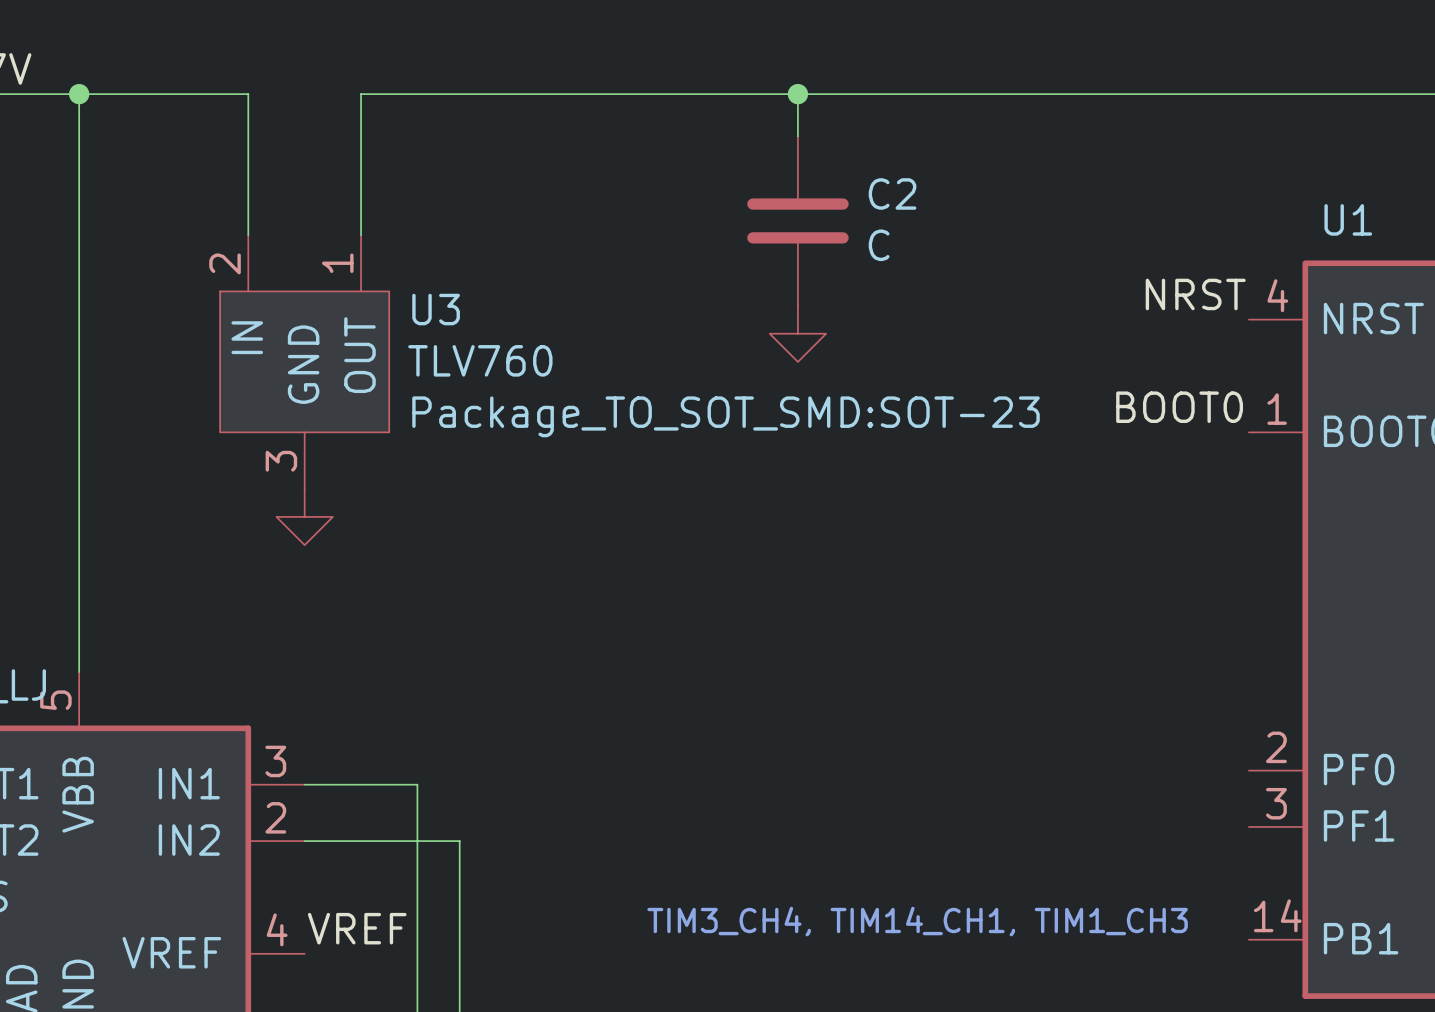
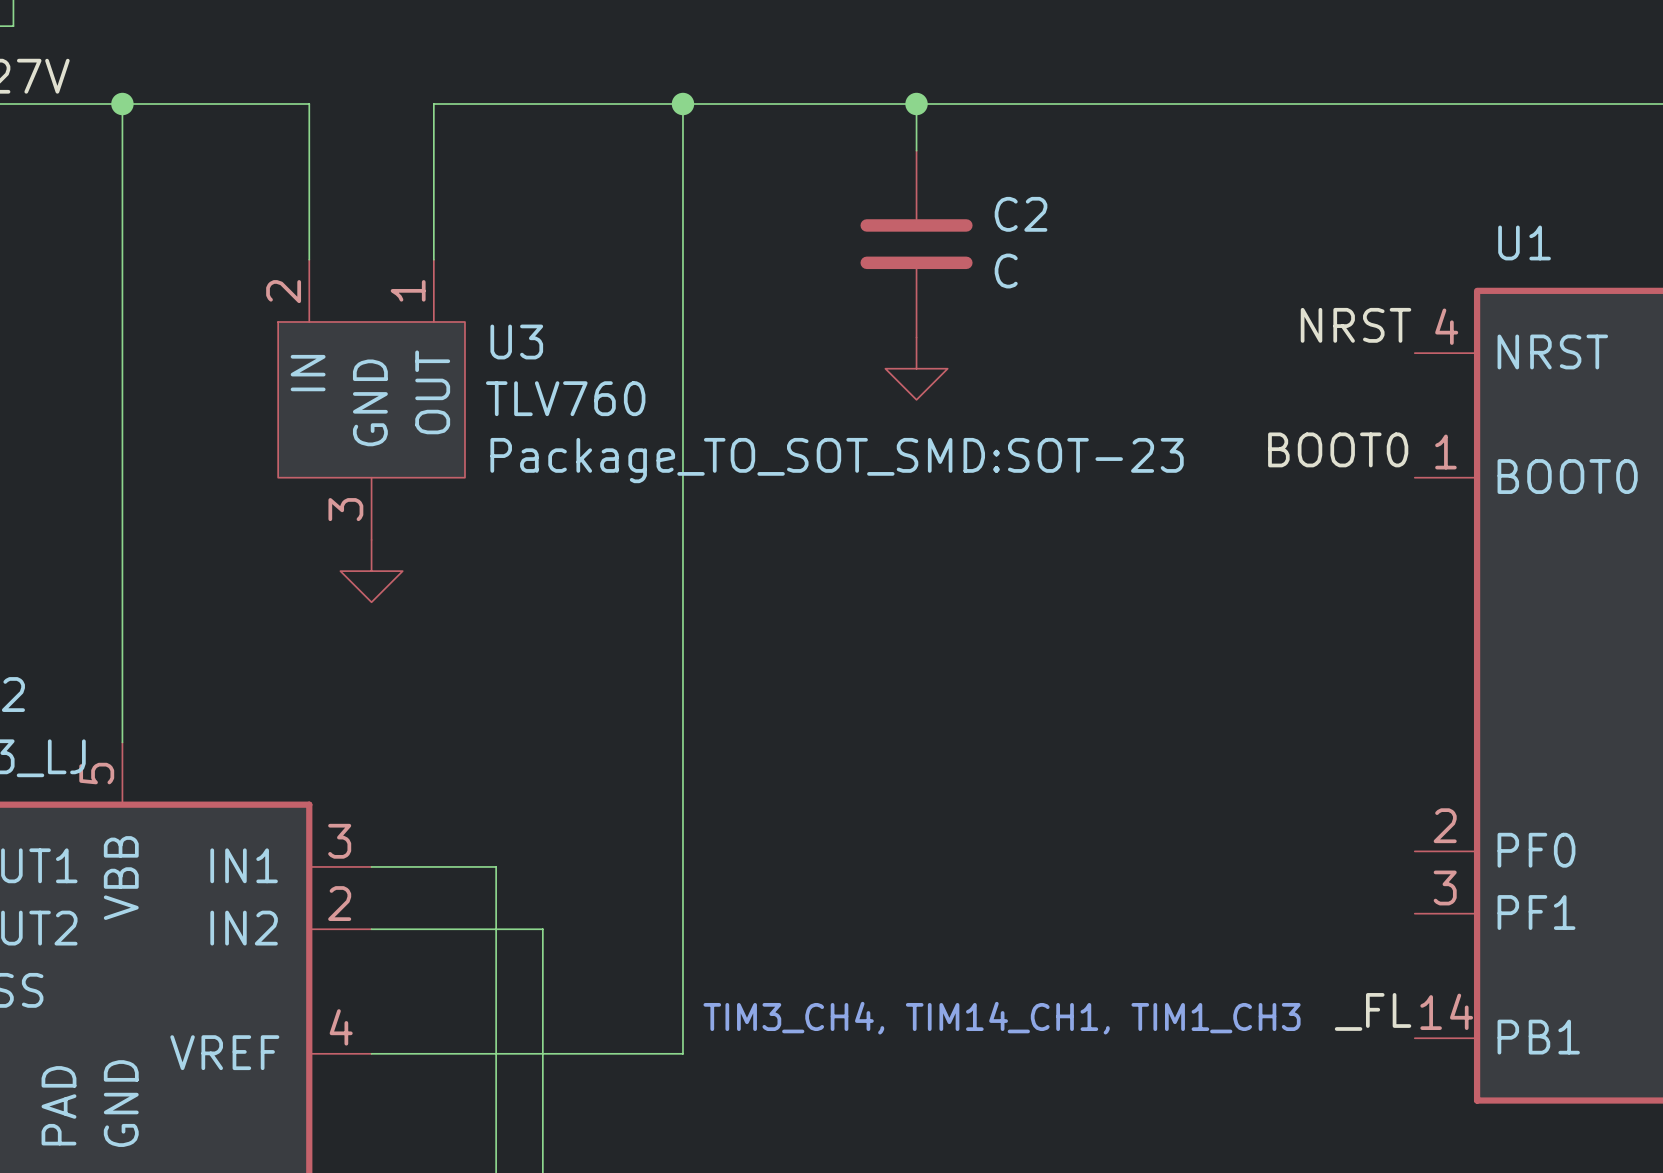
wire: none -> (682, 104) (682, 1053) (371, 1053)
junction: none -> (682, 104)
label: none -> _FL (1373, 1011)
text position: TIM3_CH4, TIM14_CH1, TIM1_CH3 (917, 921) -> TIM3_CH4, TIM14_CH1, TIM1_CH3 (1002, 1018)
label: VREF (357, 928) -> none

